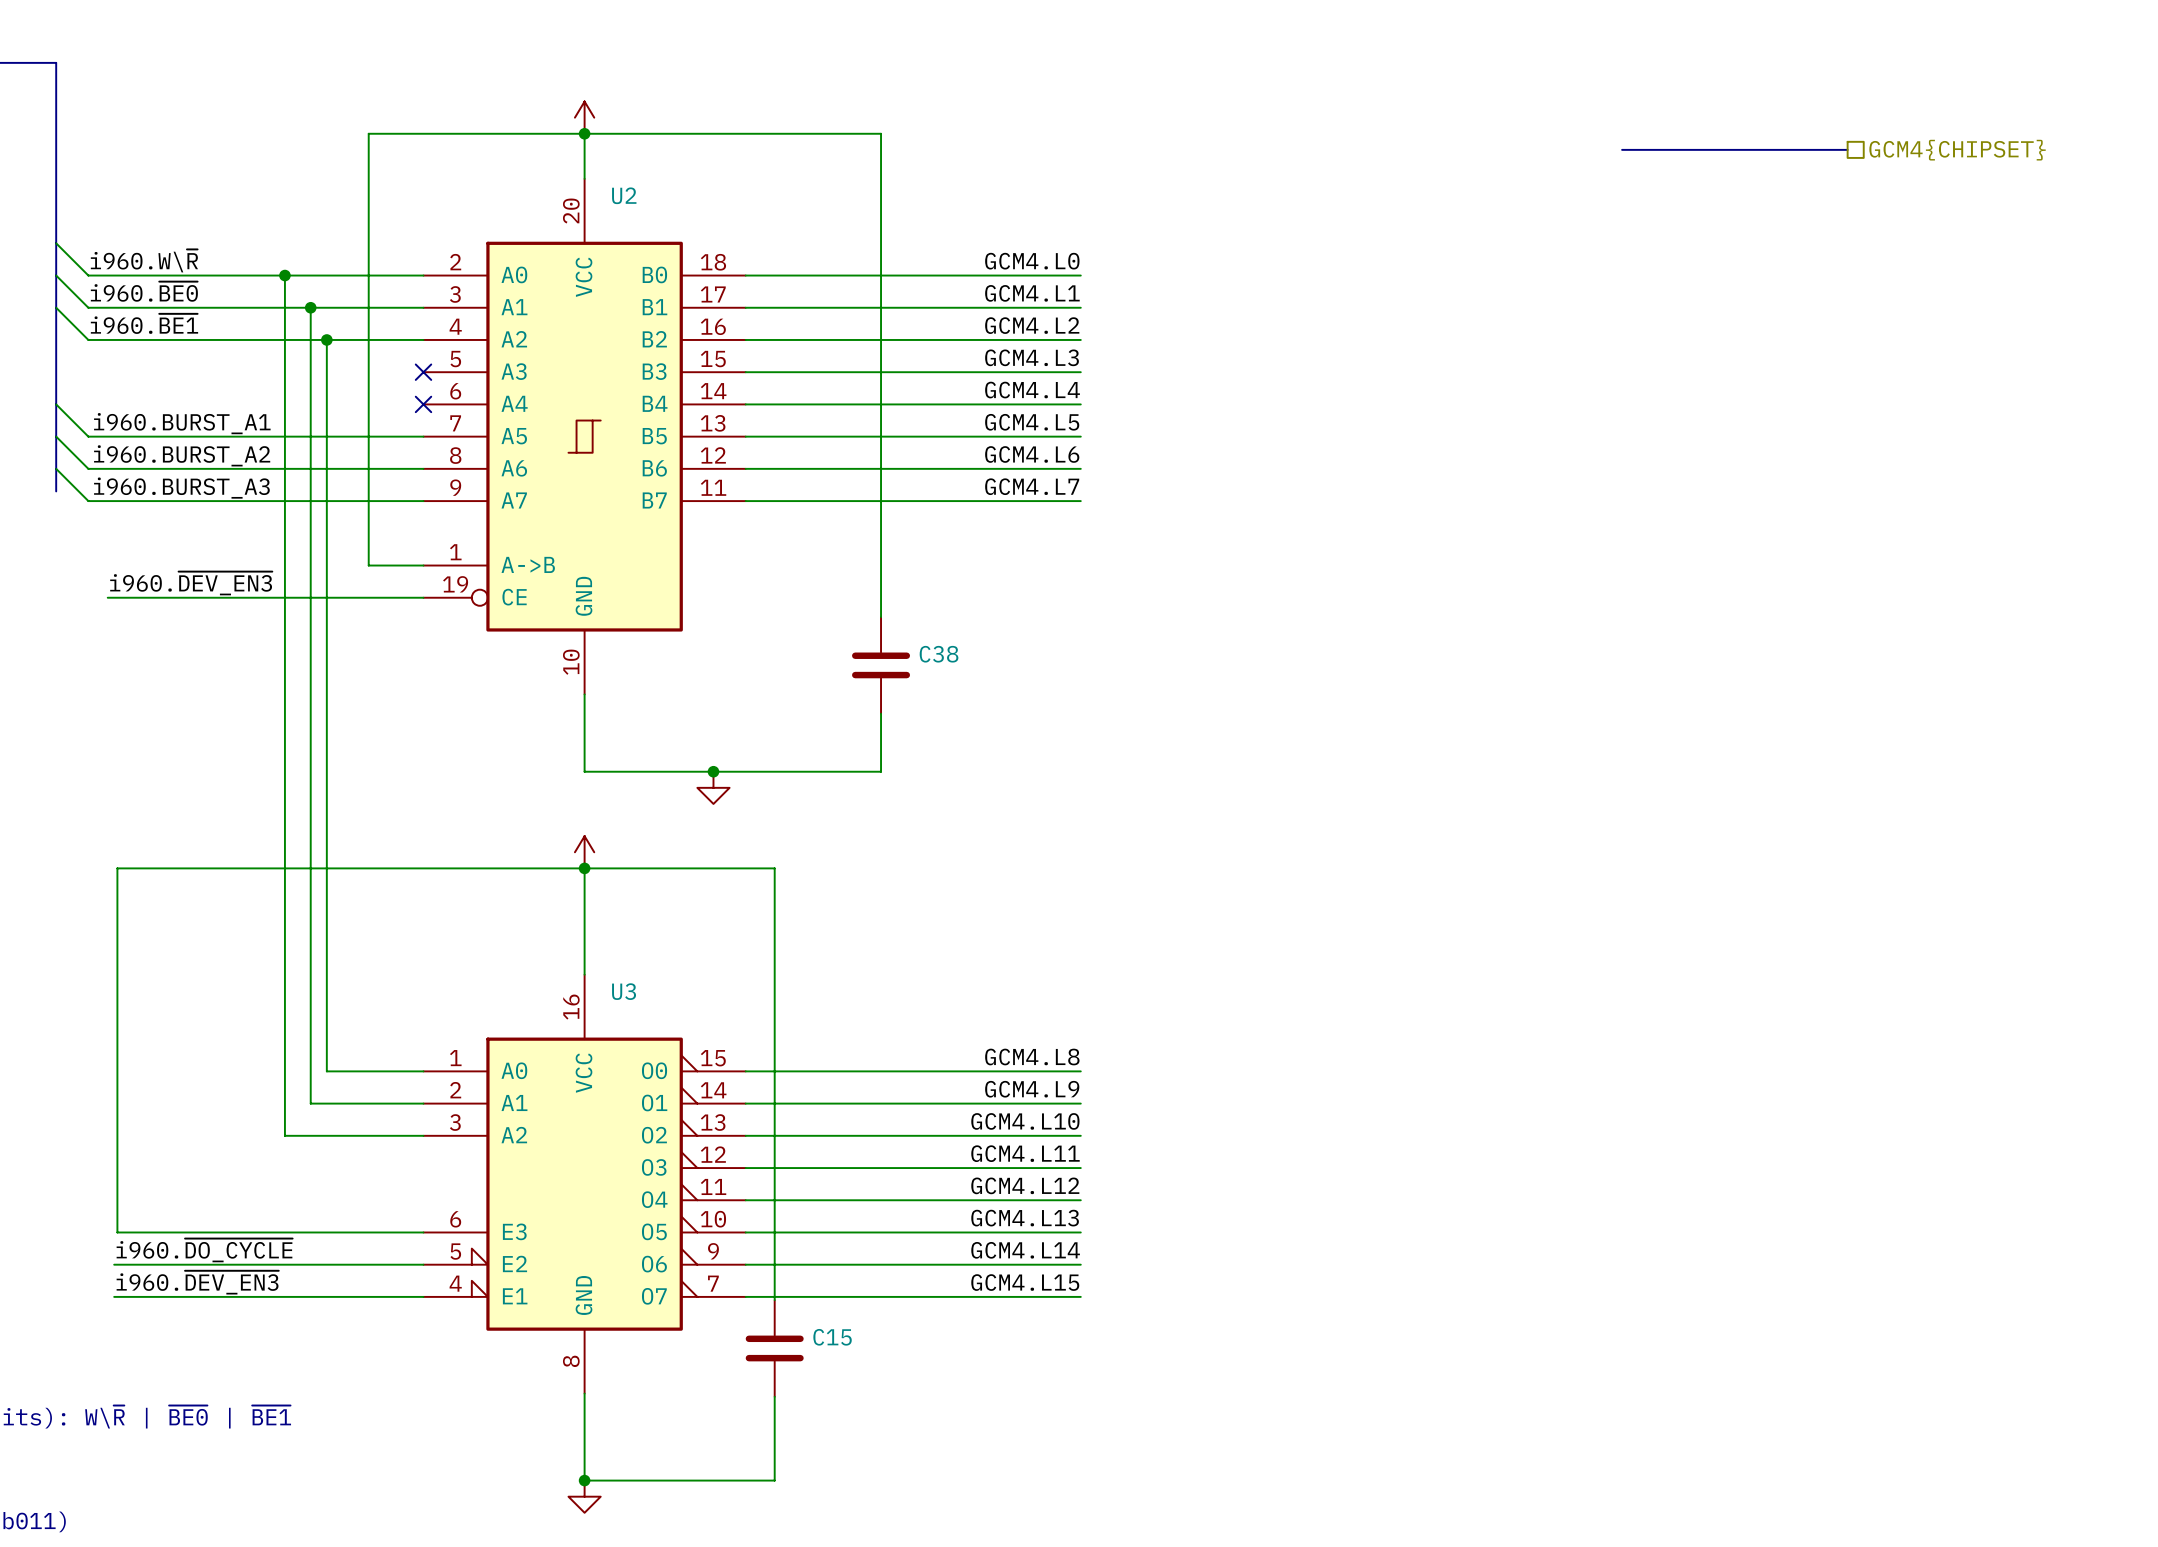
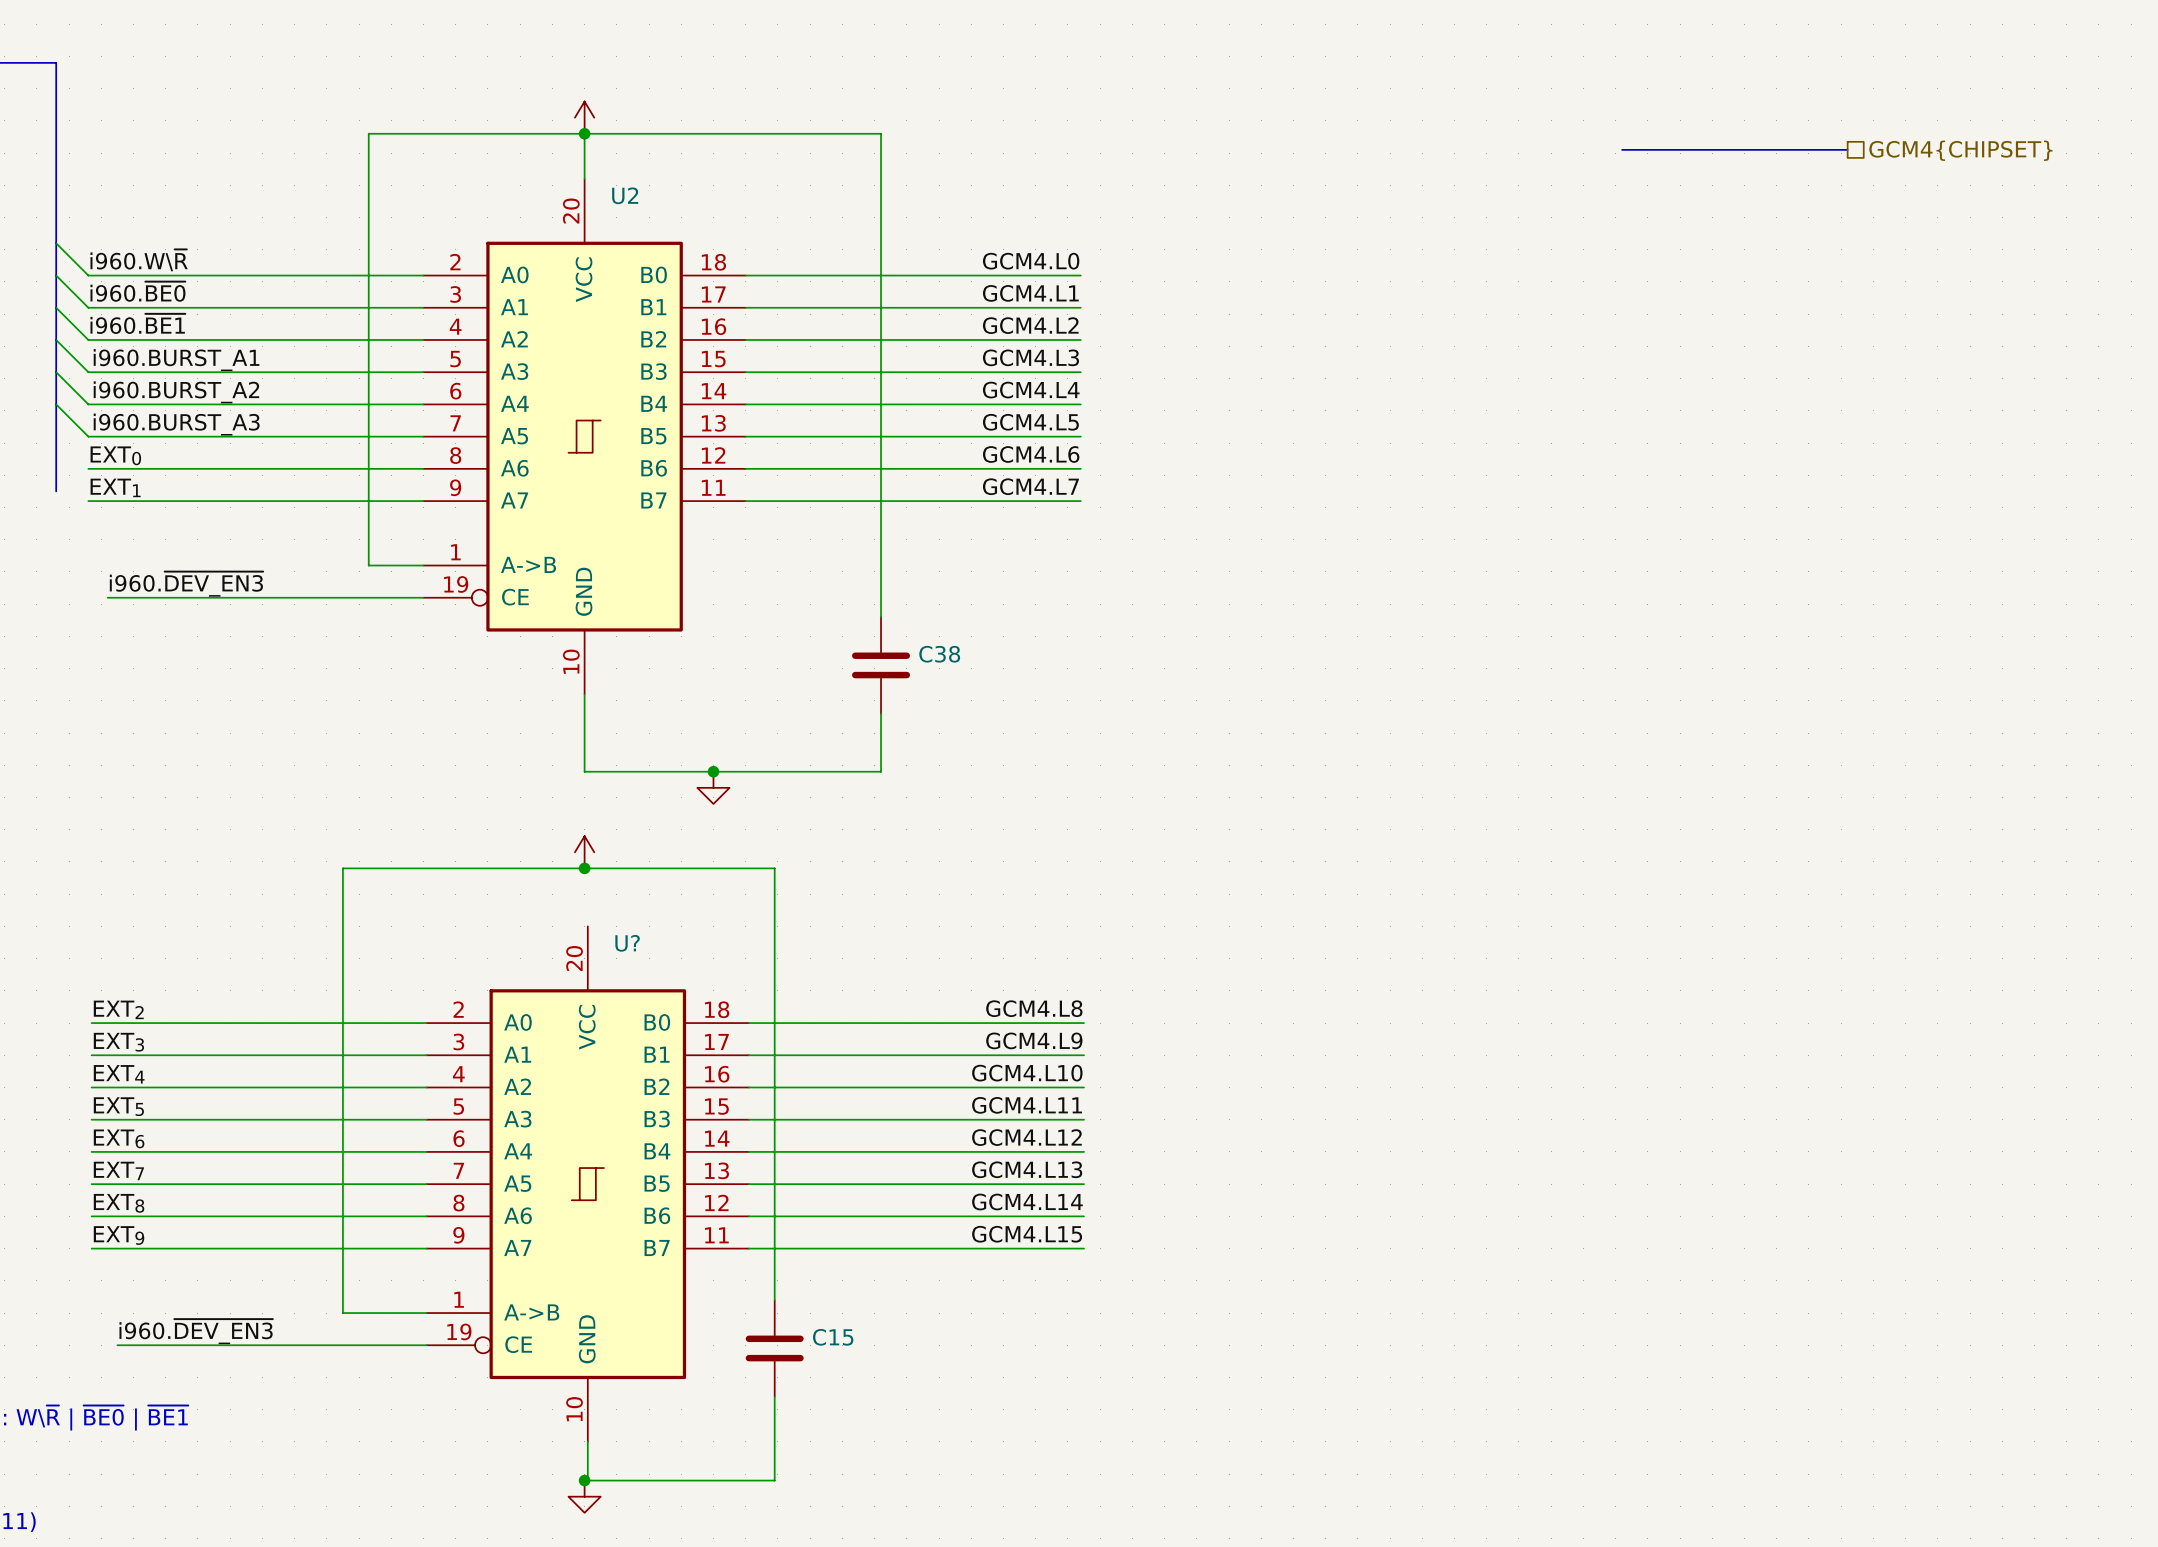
wire: (284, 275) (284, 1135) (423, 1135) -> none
junction: (284, 275) -> none
wire: (310, 307) (310, 1103) (423, 1103) -> none
junction: (310, 307) -> none
wire: none -> (56, 339) (88, 372) (423, 372)
wire: (326, 339) (326, 1071) (423, 1071) -> none
junction: (326, 339) -> none
label: none -> i960.BURST_A1 (176, 360)
wire: none -> (56, 372) (88, 404) (423, 404)
no-connect mark: (423, 372) -> none
no-connect mark: (423, 404) -> none
label: i960.BURST_A1 (182, 423) -> i960.BURST_A3 (176, 424)
wire: (56, 436) (88, 468) -> none
label: none -> EXT0 (115, 455)
label position: i960.BURST_A2 (182, 455) -> i960.BURST_A2 (176, 392)
wire: (56, 468) (88, 501) -> none
label: i960.BURST_A3 (181, 488) -> EXT1 (115, 487)
wire: (342, 868) (117, 868) (117, 1232) (423, 1232) -> (342, 868) (342, 1313) (426, 1313)
wire: (584, 868) (584, 974) -> none
label: none -> EXT2 (118, 1009)
wire: none -> (91, 1023) (426, 1023)
label: none -> EXT3 (118, 1042)
wire: none -> (91, 1055) (426, 1055)
label position: GCM4.L8 (1032, 1057) -> GCM4.L8 (1034, 1008)
wire: (745, 1071) (1080, 1071) -> (748, 1023) (1084, 1023)
label: none -> EXT4 (119, 1074)
wire: none -> (91, 1087) (426, 1087)
label position: GCM4.L9 (1032, 1089) -> GCM4.L9 (1034, 1040)
wire: (745, 1103) (1080, 1103) -> (748, 1055) (1084, 1055)
label: none -> EXT5 (118, 1106)
wire: none -> (91, 1119) (426, 1119)
label position: GCM4.L10 (1025, 1121) -> GCM4.L10 (1027, 1073)
wire: (745, 1135) (1080, 1135) -> (748, 1087) (1084, 1087)
label: none -> EXT6 (119, 1138)
wire: none -> (91, 1151) (426, 1151)
label position: GCM4.L11 (1025, 1153) -> GCM4.L11 (1027, 1105)
wire: (745, 1168) (1080, 1168) -> (748, 1119) (1084, 1119)
label: none -> EXT7 (118, 1170)
wire: none -> (91, 1184) (426, 1184)
U3: (584, 1184) -> none
U?: none -> (587, 1184)
label position: GCM4.L12 (1025, 1185) -> GCM4.L12 (1026, 1137)
wire: (745, 1200) (1080, 1200) -> (748, 1151) (1084, 1151)
label: none -> EXT8 (119, 1203)
wire: none -> (91, 1216) (426, 1216)
label position: GCM4.L13 (1025, 1218) -> GCM4.L13 (1027, 1169)
wire: (745, 1232) (1080, 1232) -> (748, 1184) (1084, 1184)
label: none -> EXT9 (119, 1235)
wire: none -> (91, 1248) (426, 1248)
label: i960.~{DO_CYCLE} (204, 1250) -> none
label position: GCM4.L14 (1025, 1250) -> GCM4.L14 (1027, 1202)
wire: (114, 1264) (423, 1264) -> none
wire: (745, 1264) (1080, 1264) -> (748, 1216) (1084, 1216)
label position: i960.~{DEV_EN3} (197, 1282) -> i960.~{DEV_EN3} (196, 1331)
label position: GCM4.L15 (1025, 1282) -> GCM4.L15 (1027, 1234)
wire: (114, 1296) (423, 1296) -> (117, 1345) (426, 1345)
wire: (745, 1296) (1080, 1296) -> (748, 1248) (1084, 1248)
wire: (584, 1393) (584, 1480) (587, 1480) -> (587, 1441) (587, 1480)

